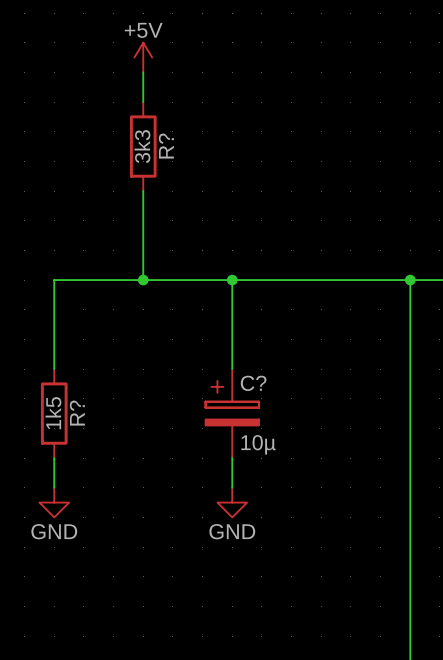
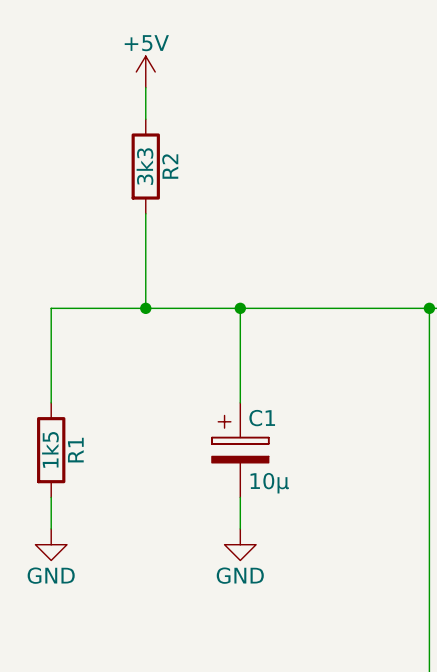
R? name: R? (166, 146) -> R2 (170, 166)
C? name: C? (253, 383) -> C1 (262, 418)
R? name: R? (77, 413) -> R1 (75, 450)

